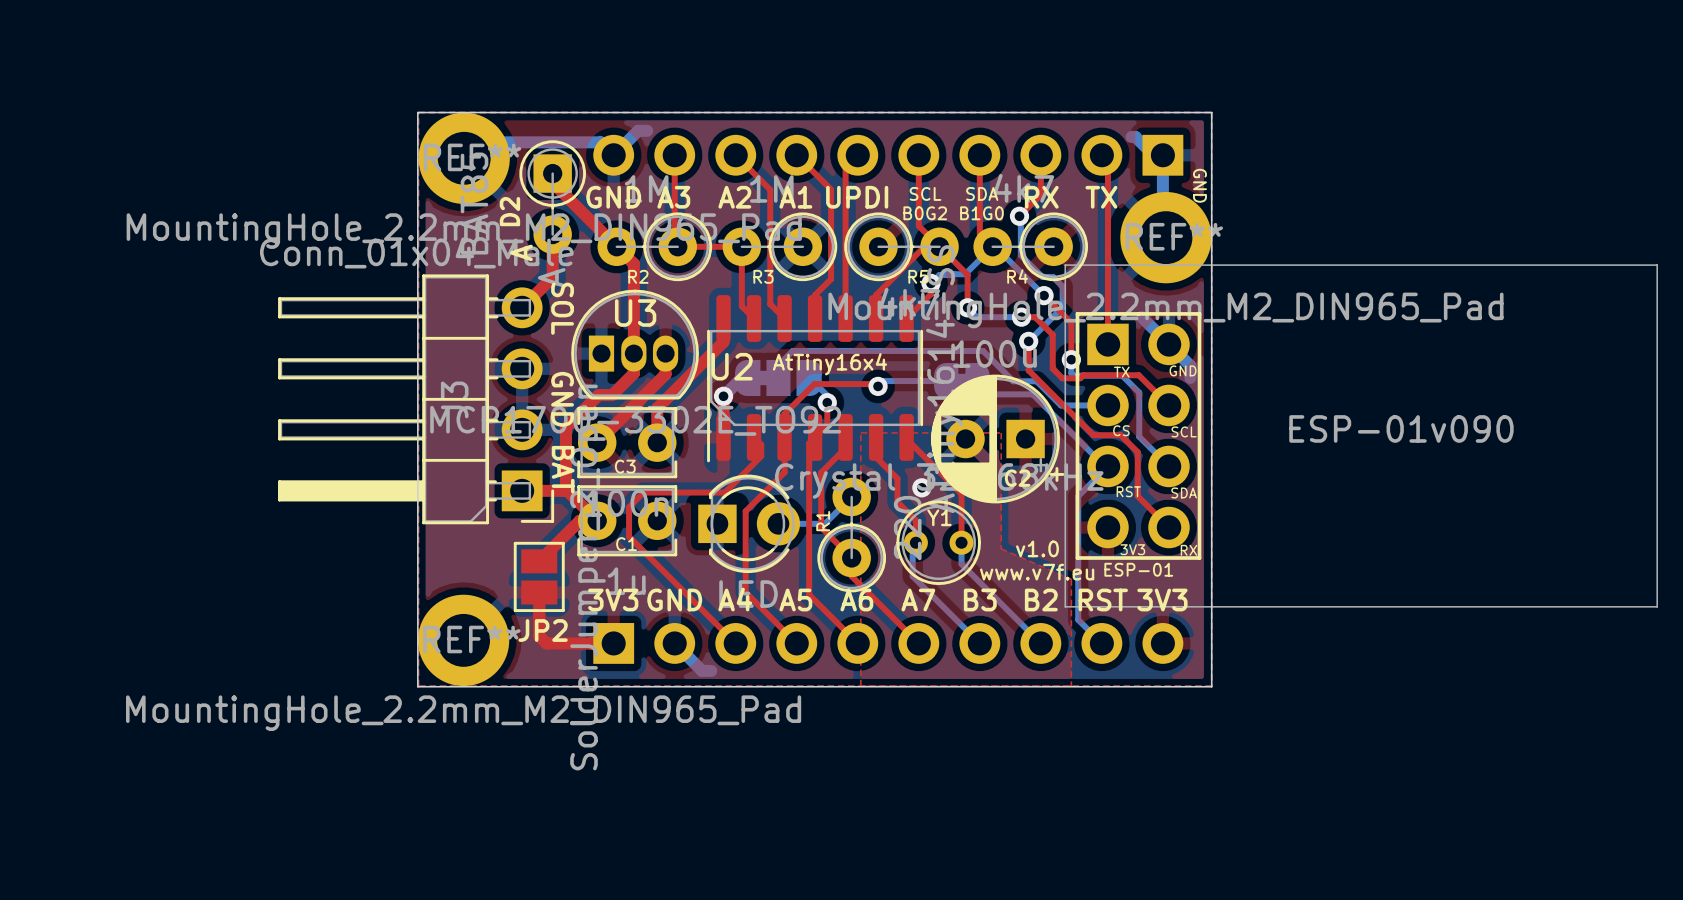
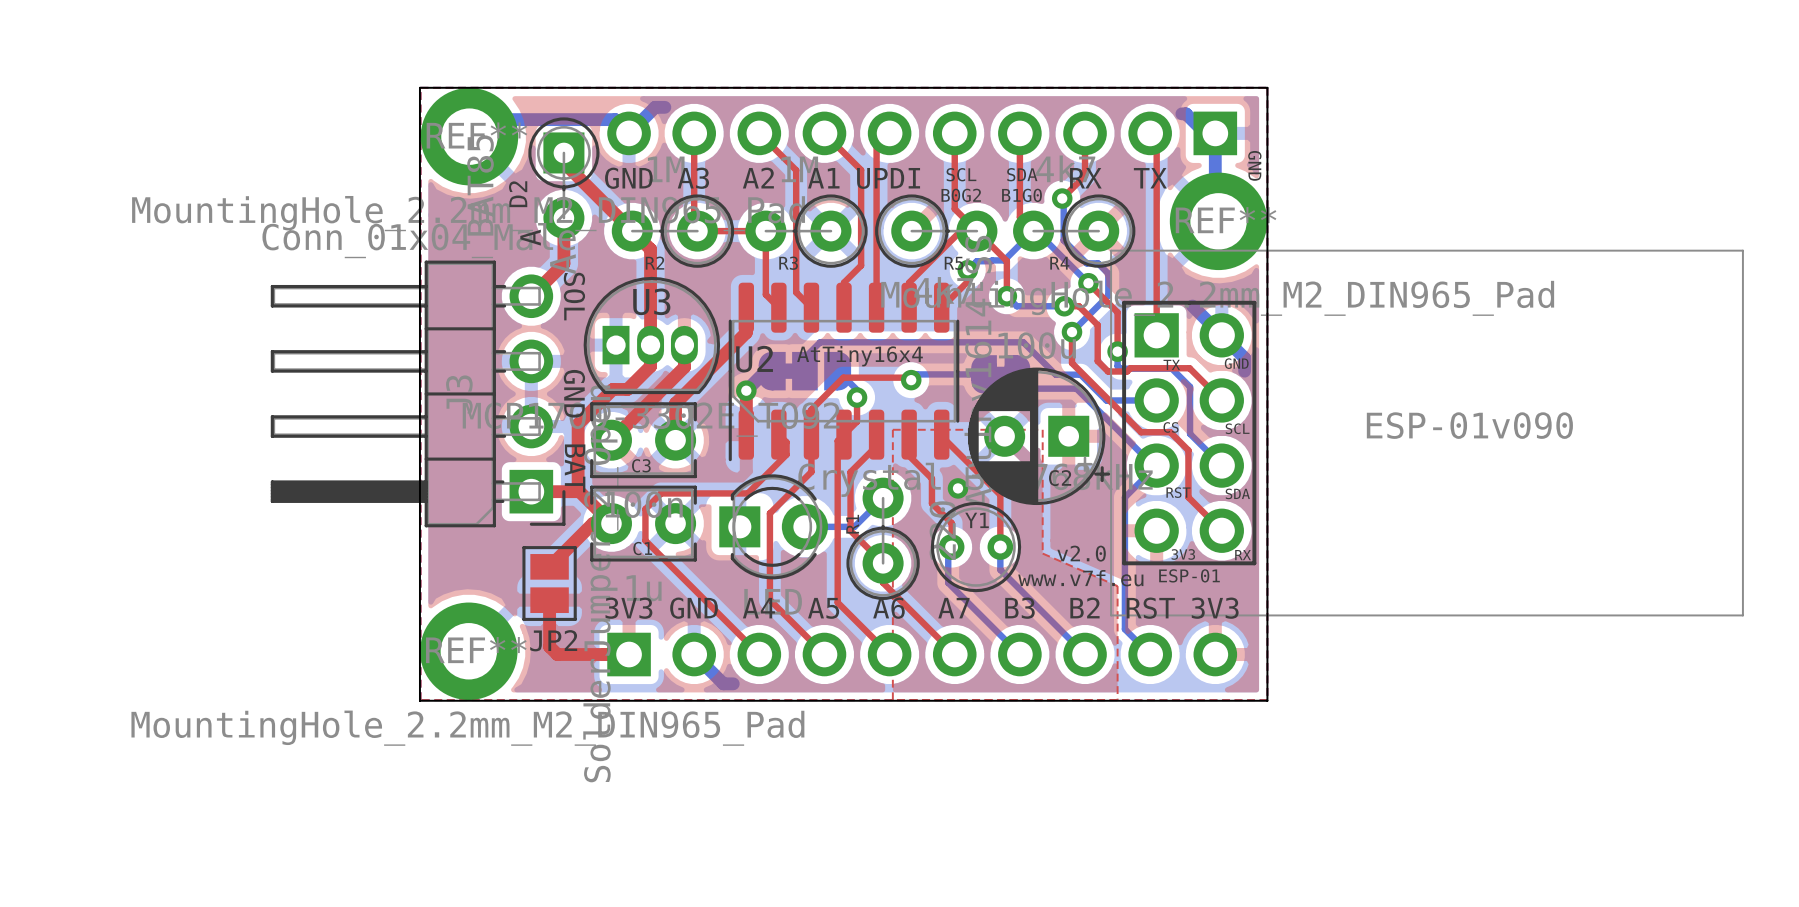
text: v1.0 (1037, 548) -> v2.0 (1081, 553)

